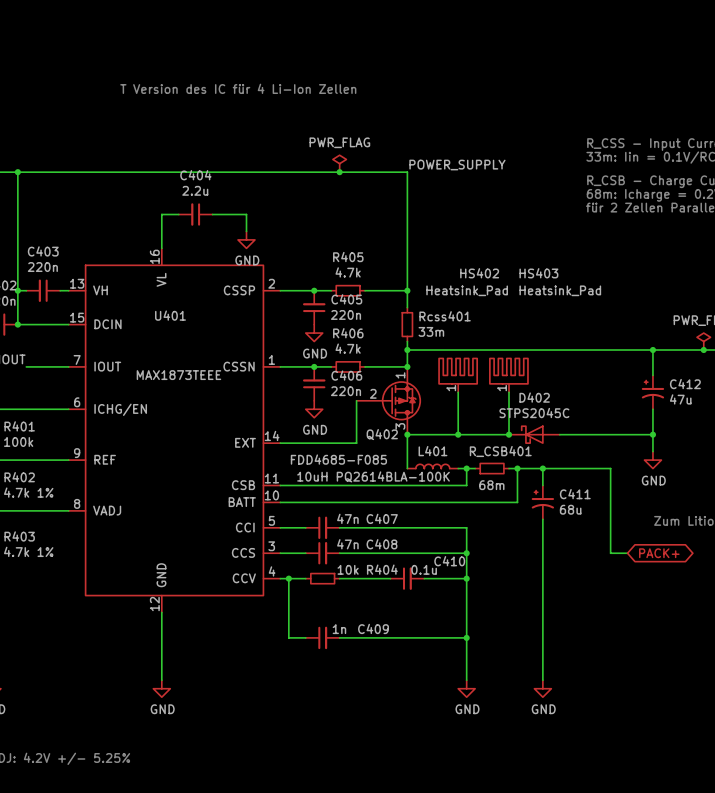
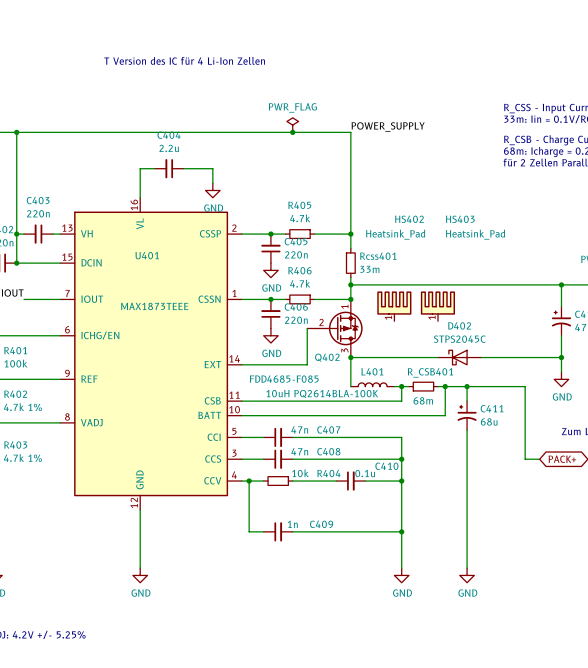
wire: (458, 392) (458, 434) -> none
wire: (509, 392) (509, 434) -> none
junction: (458, 434) -> none
junction: (509, 434) -> none

